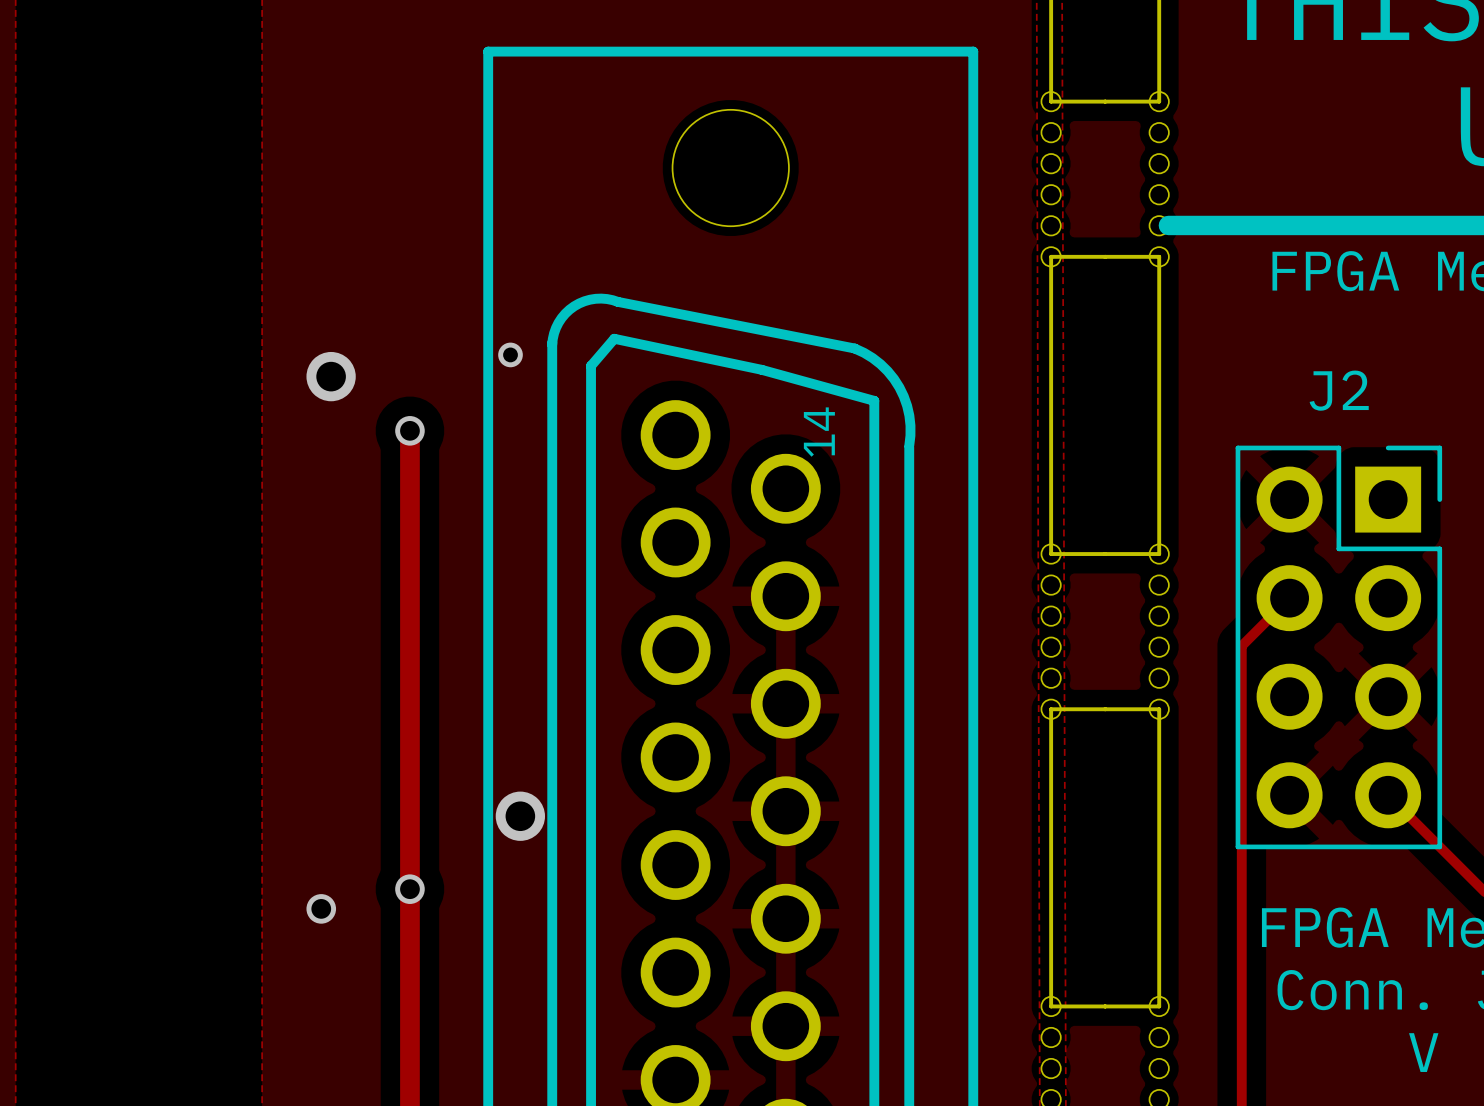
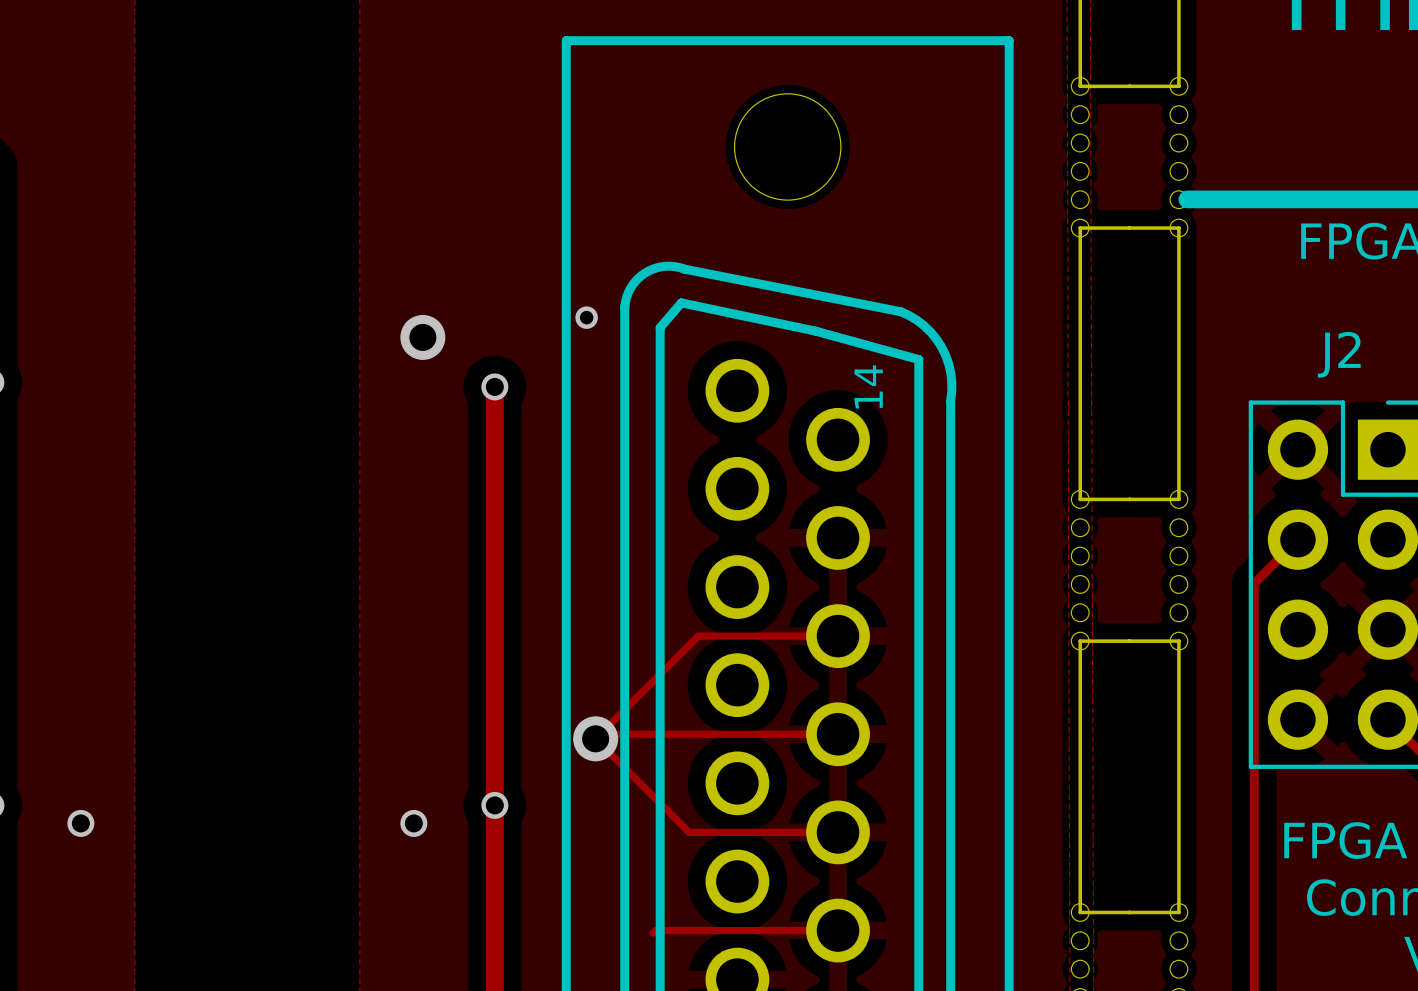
track: none -> (838, 636) (698, 636) (595, 738) (689, 832) (838, 832)
track: none -> (600, 734) (838, 734)
track: none -> (838, 930) (655, 930) (653, 933)

